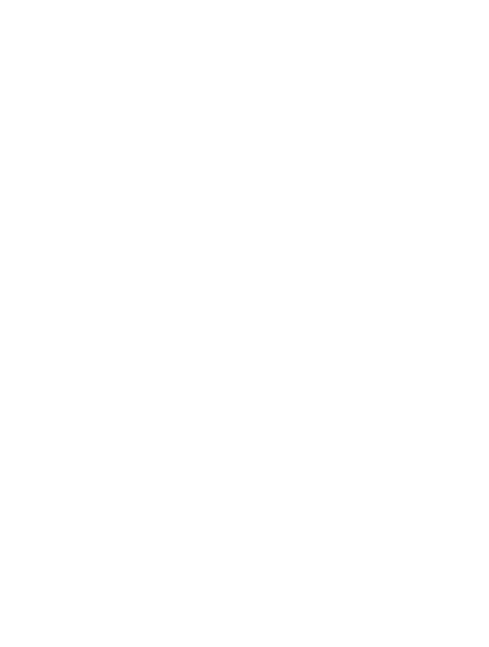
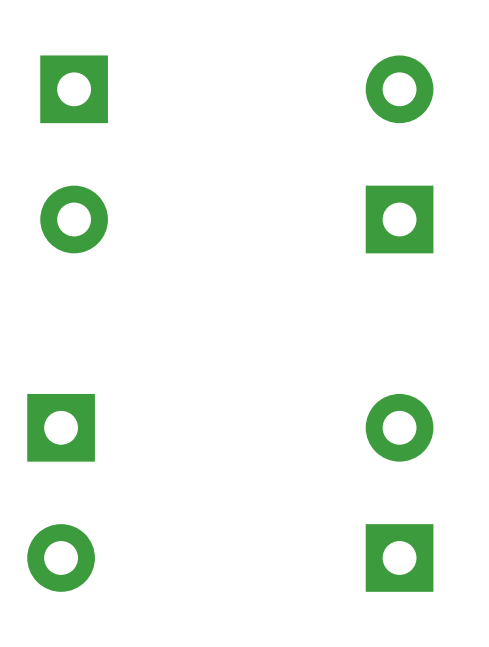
part: none -> (74, 154)
part: none -> (399, 154)
part: none -> (61, 492)
part: none -> (399, 492)

